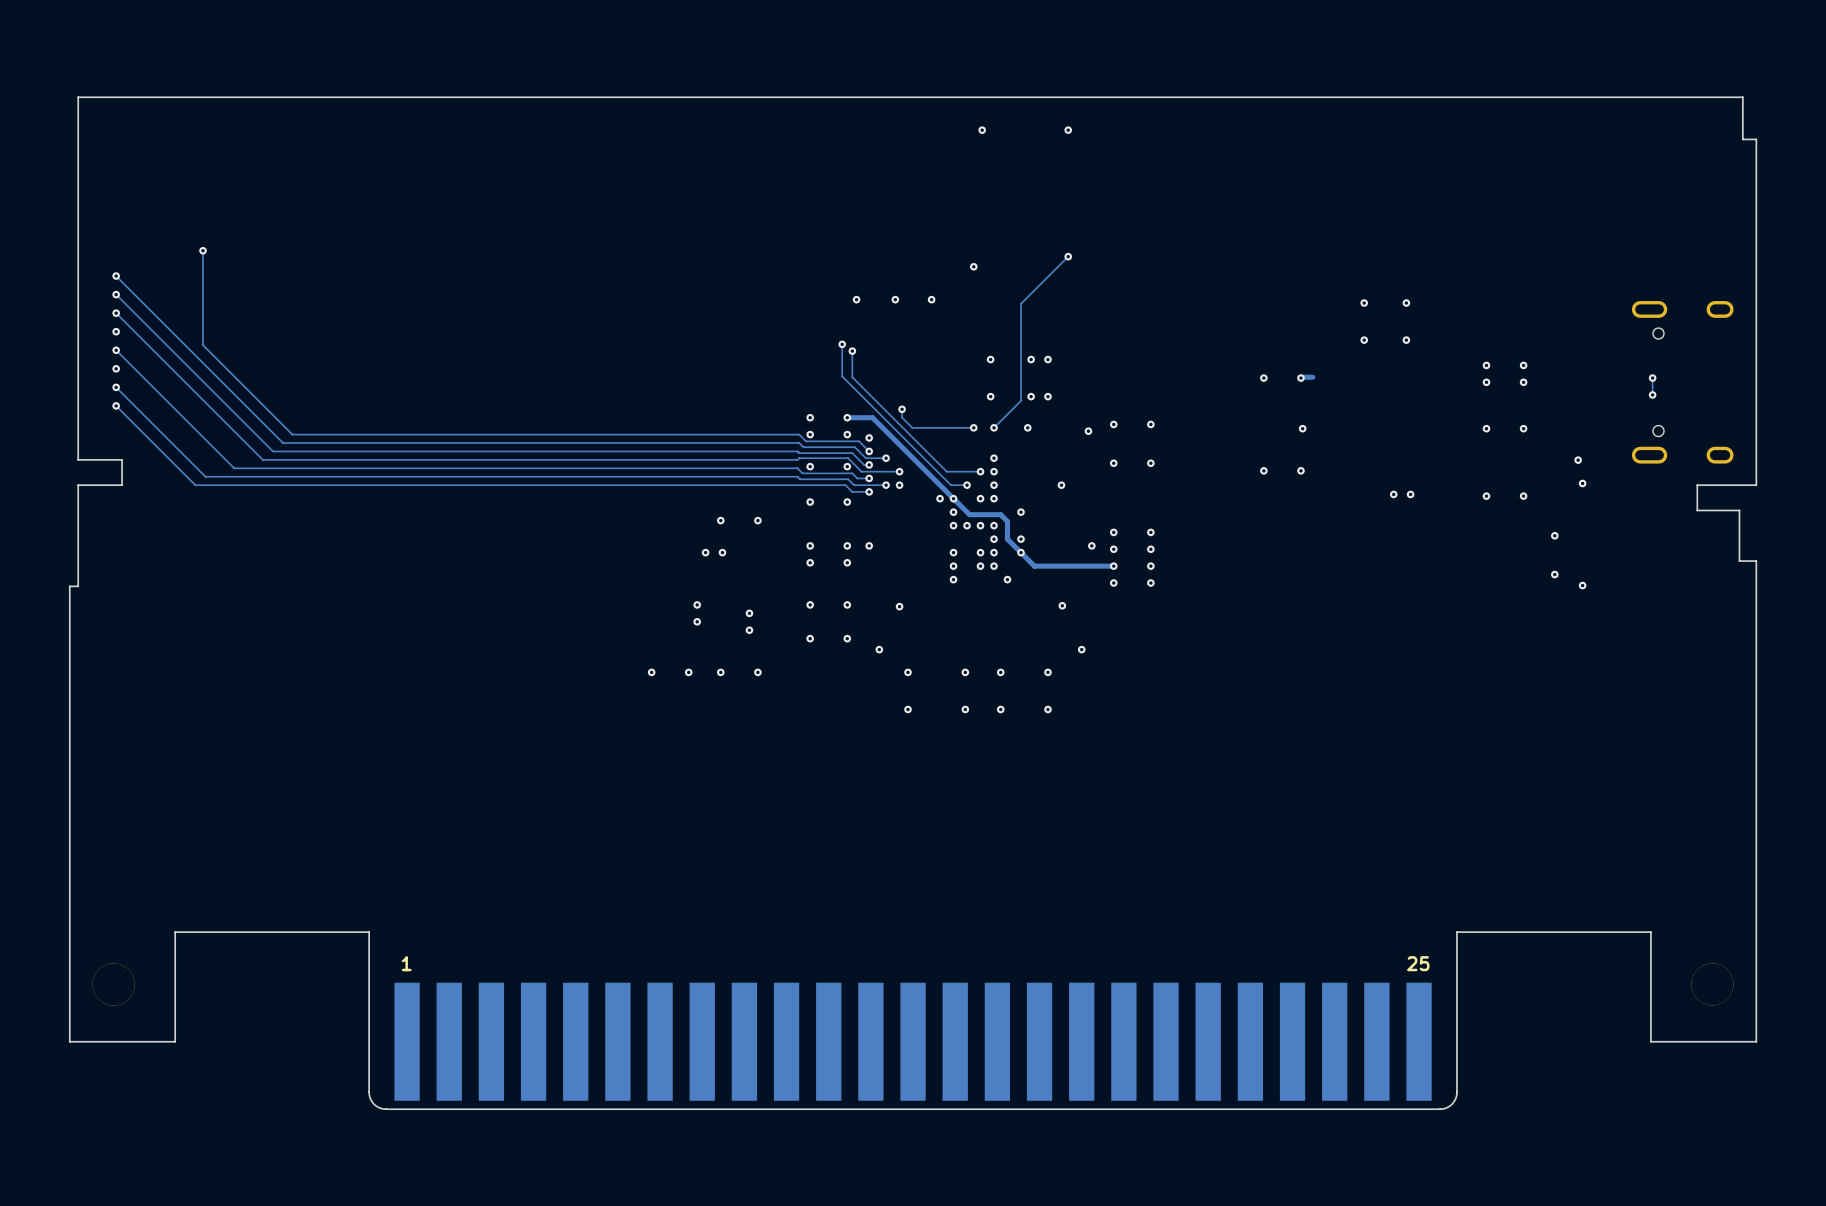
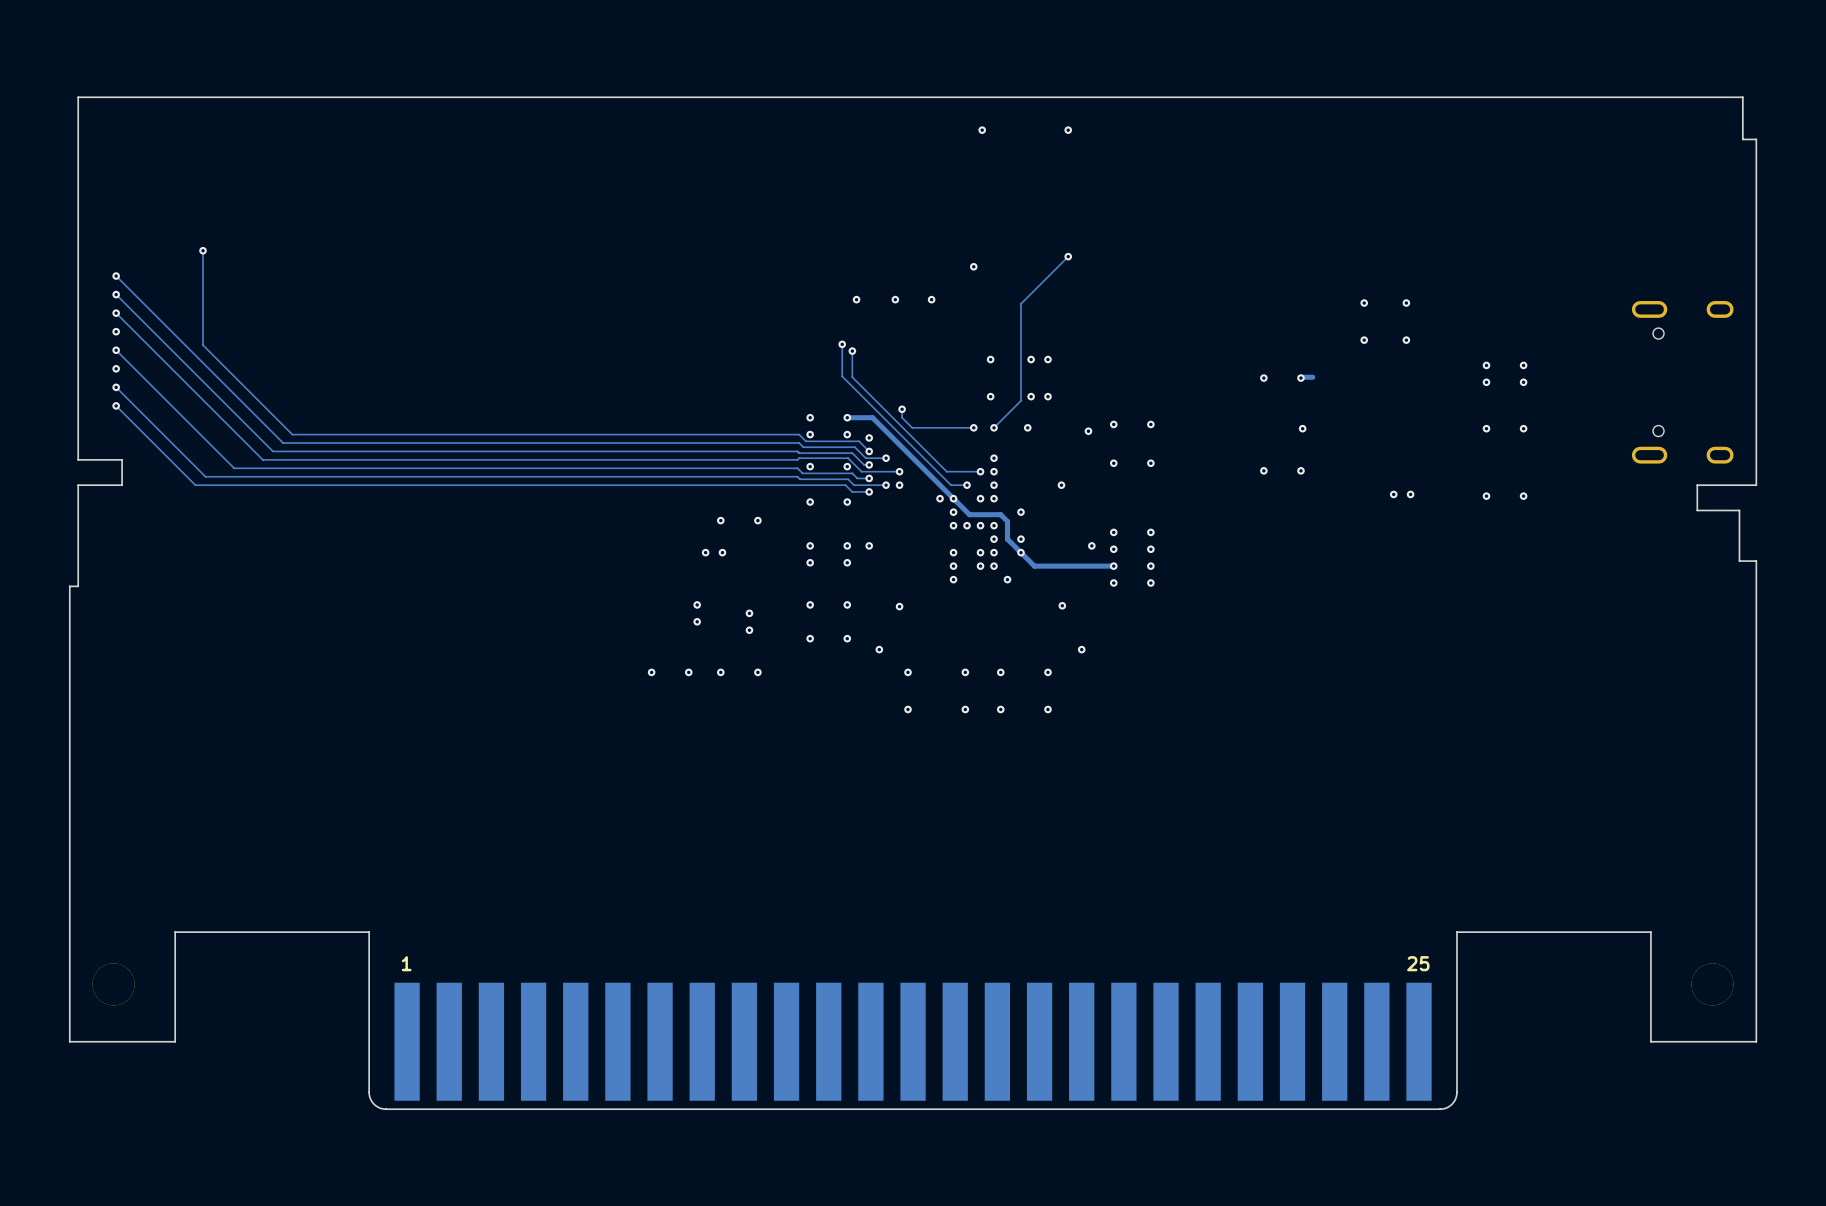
track: (1652, 378) (1652, 394) -> none
via: (1652, 378) -> none
via: (1652, 394) -> none
via: (1578, 460) -> none
via: (1582, 483) -> none
via: (1554, 535) -> none
via: (1554, 574) -> none
via: (1582, 585) -> none

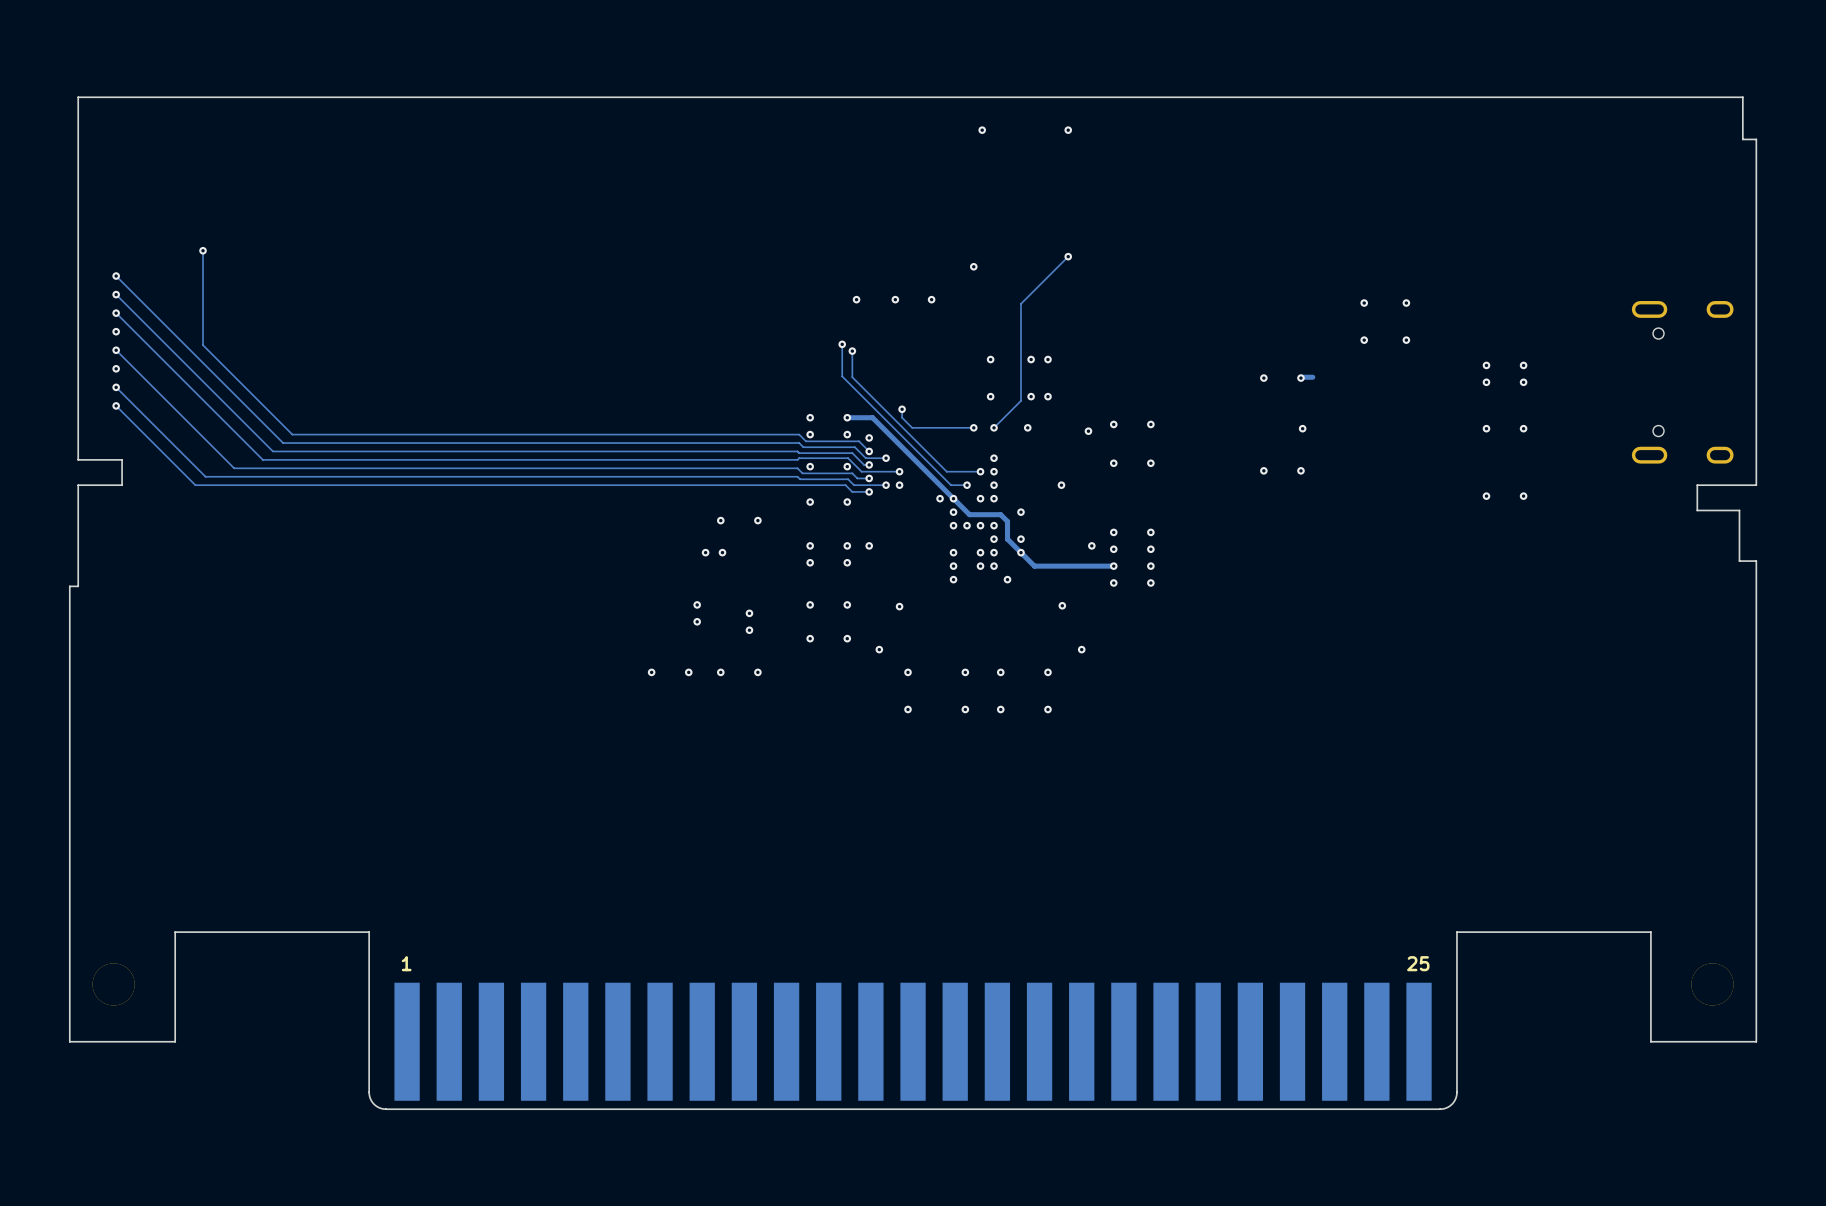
via: (1393, 494) -> none
via: (1410, 494) -> none

